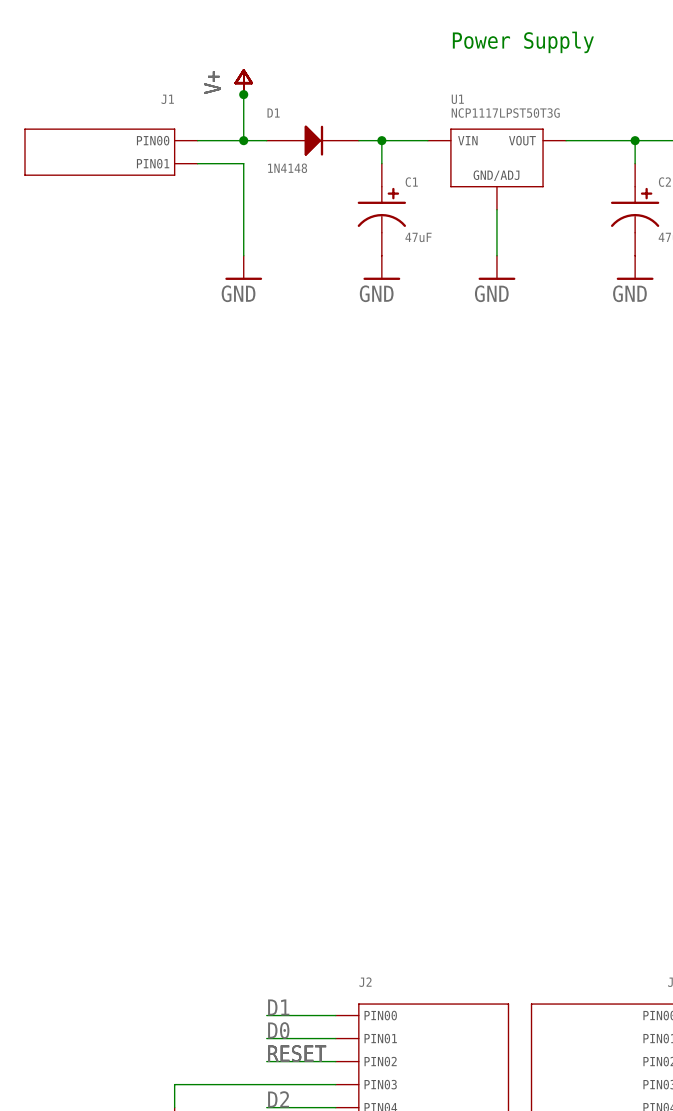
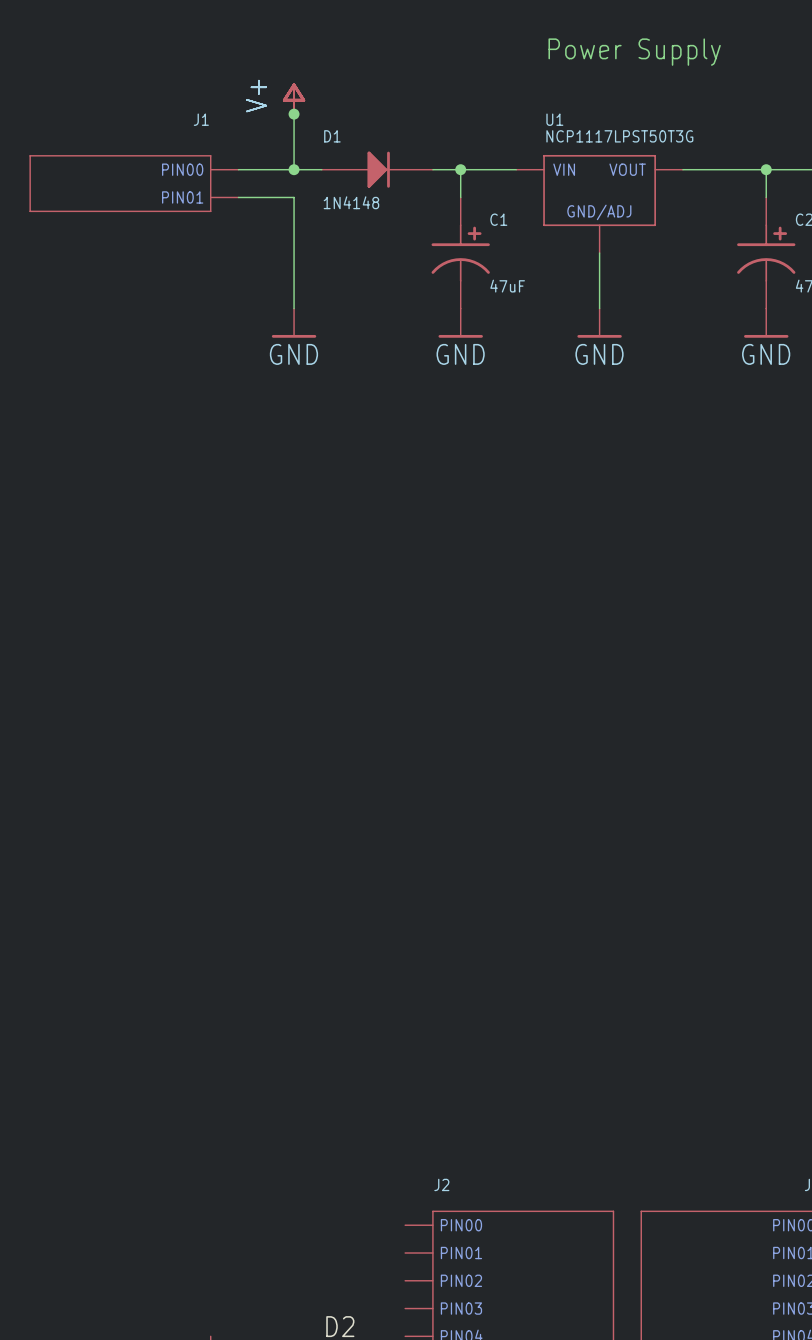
label: D1 (278, 1007) -> none
wire: (266, 1015) (335, 1015) -> none
label: D0 (278, 1030) -> none
wire: (266, 1038) (335, 1038) -> none
label: RESET (297, 1053) -> none
wire: (266, 1061) (335, 1061) -> none
wire: (335, 1084) (174, 1084) (174, 1107) -> none
wire: (266, 1107) (335, 1107) -> none

